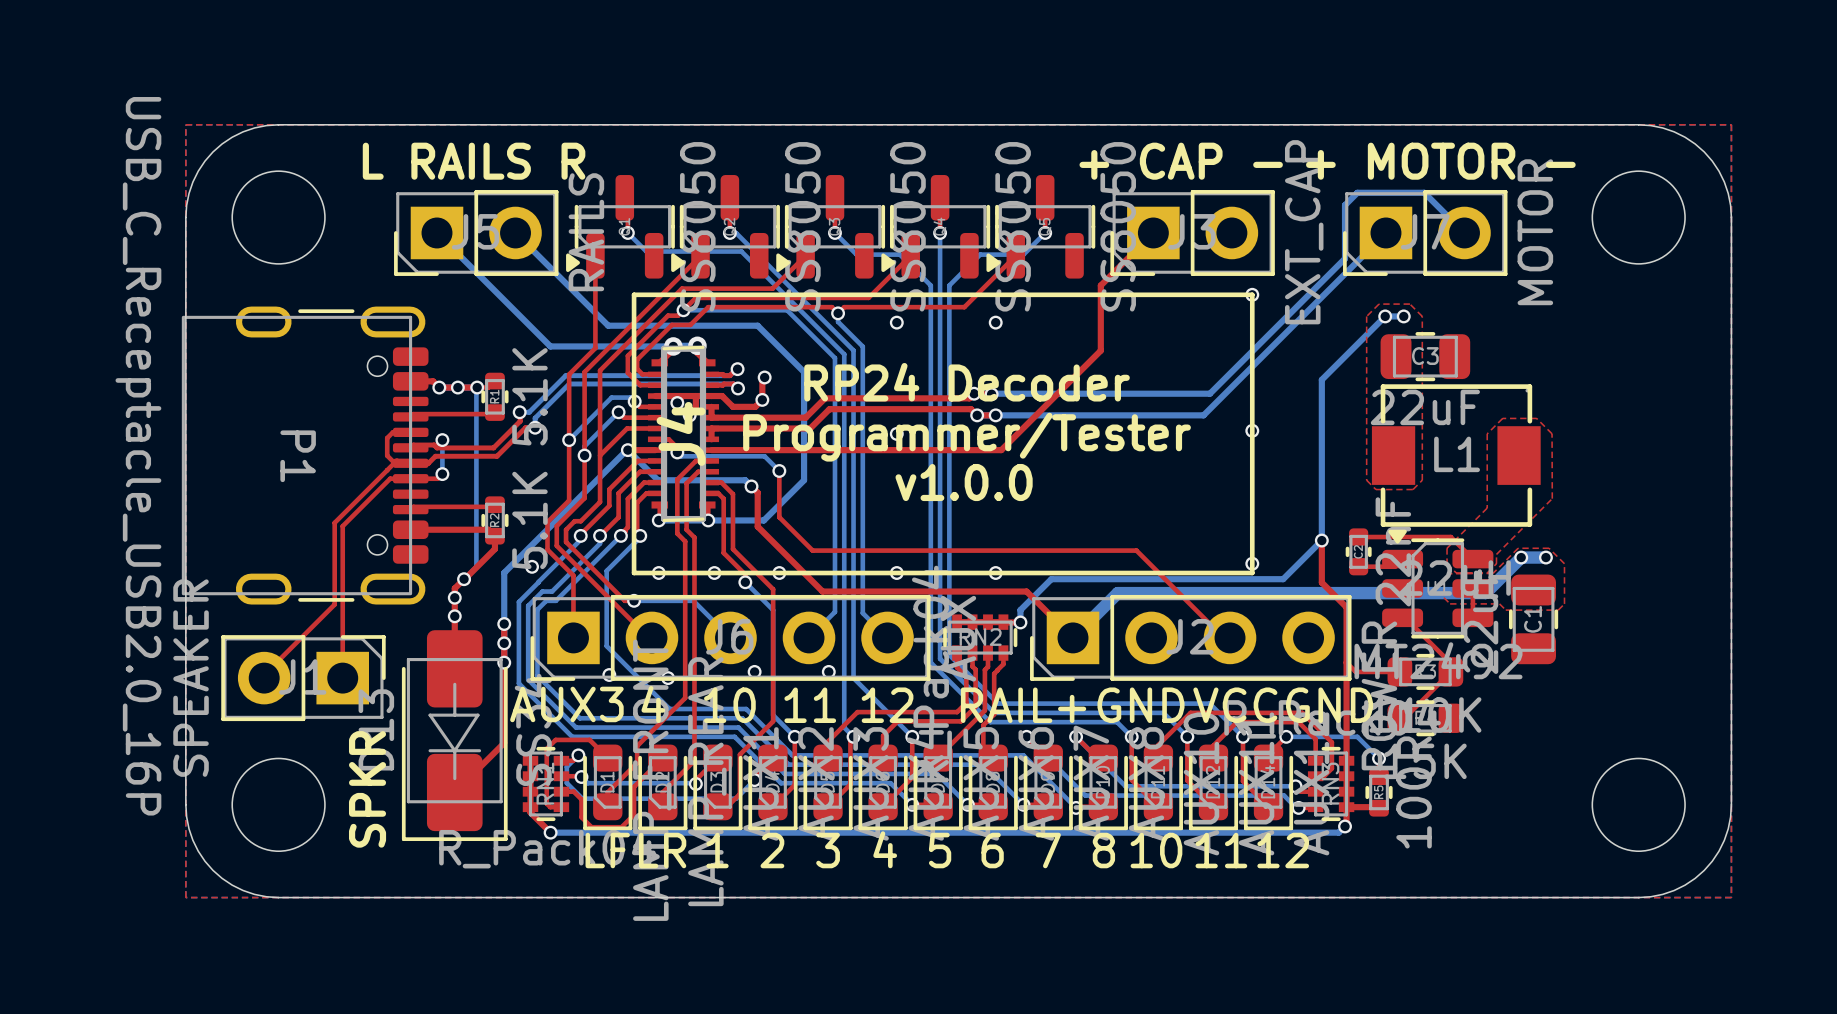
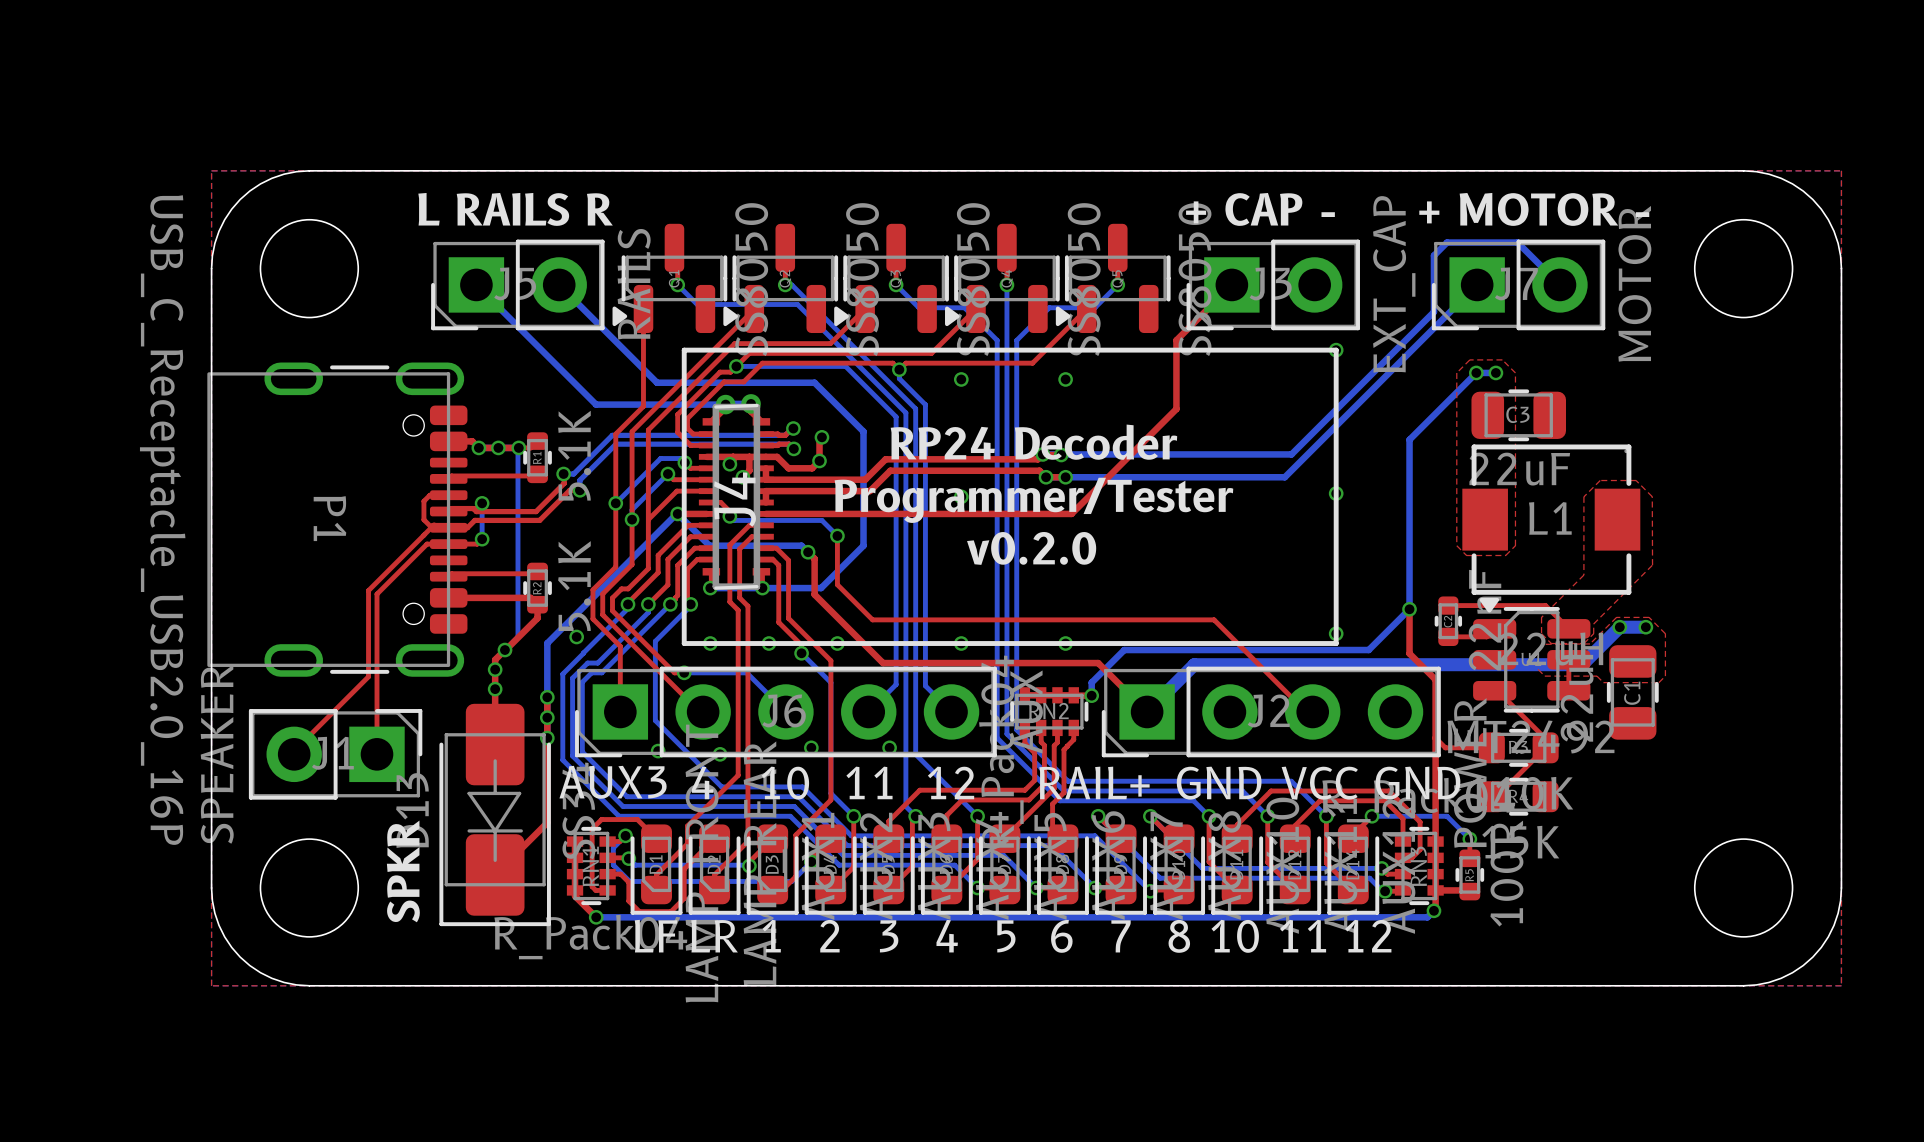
text: v1.0.0 (964, 482) -> v0.2.0 (1031, 548)

